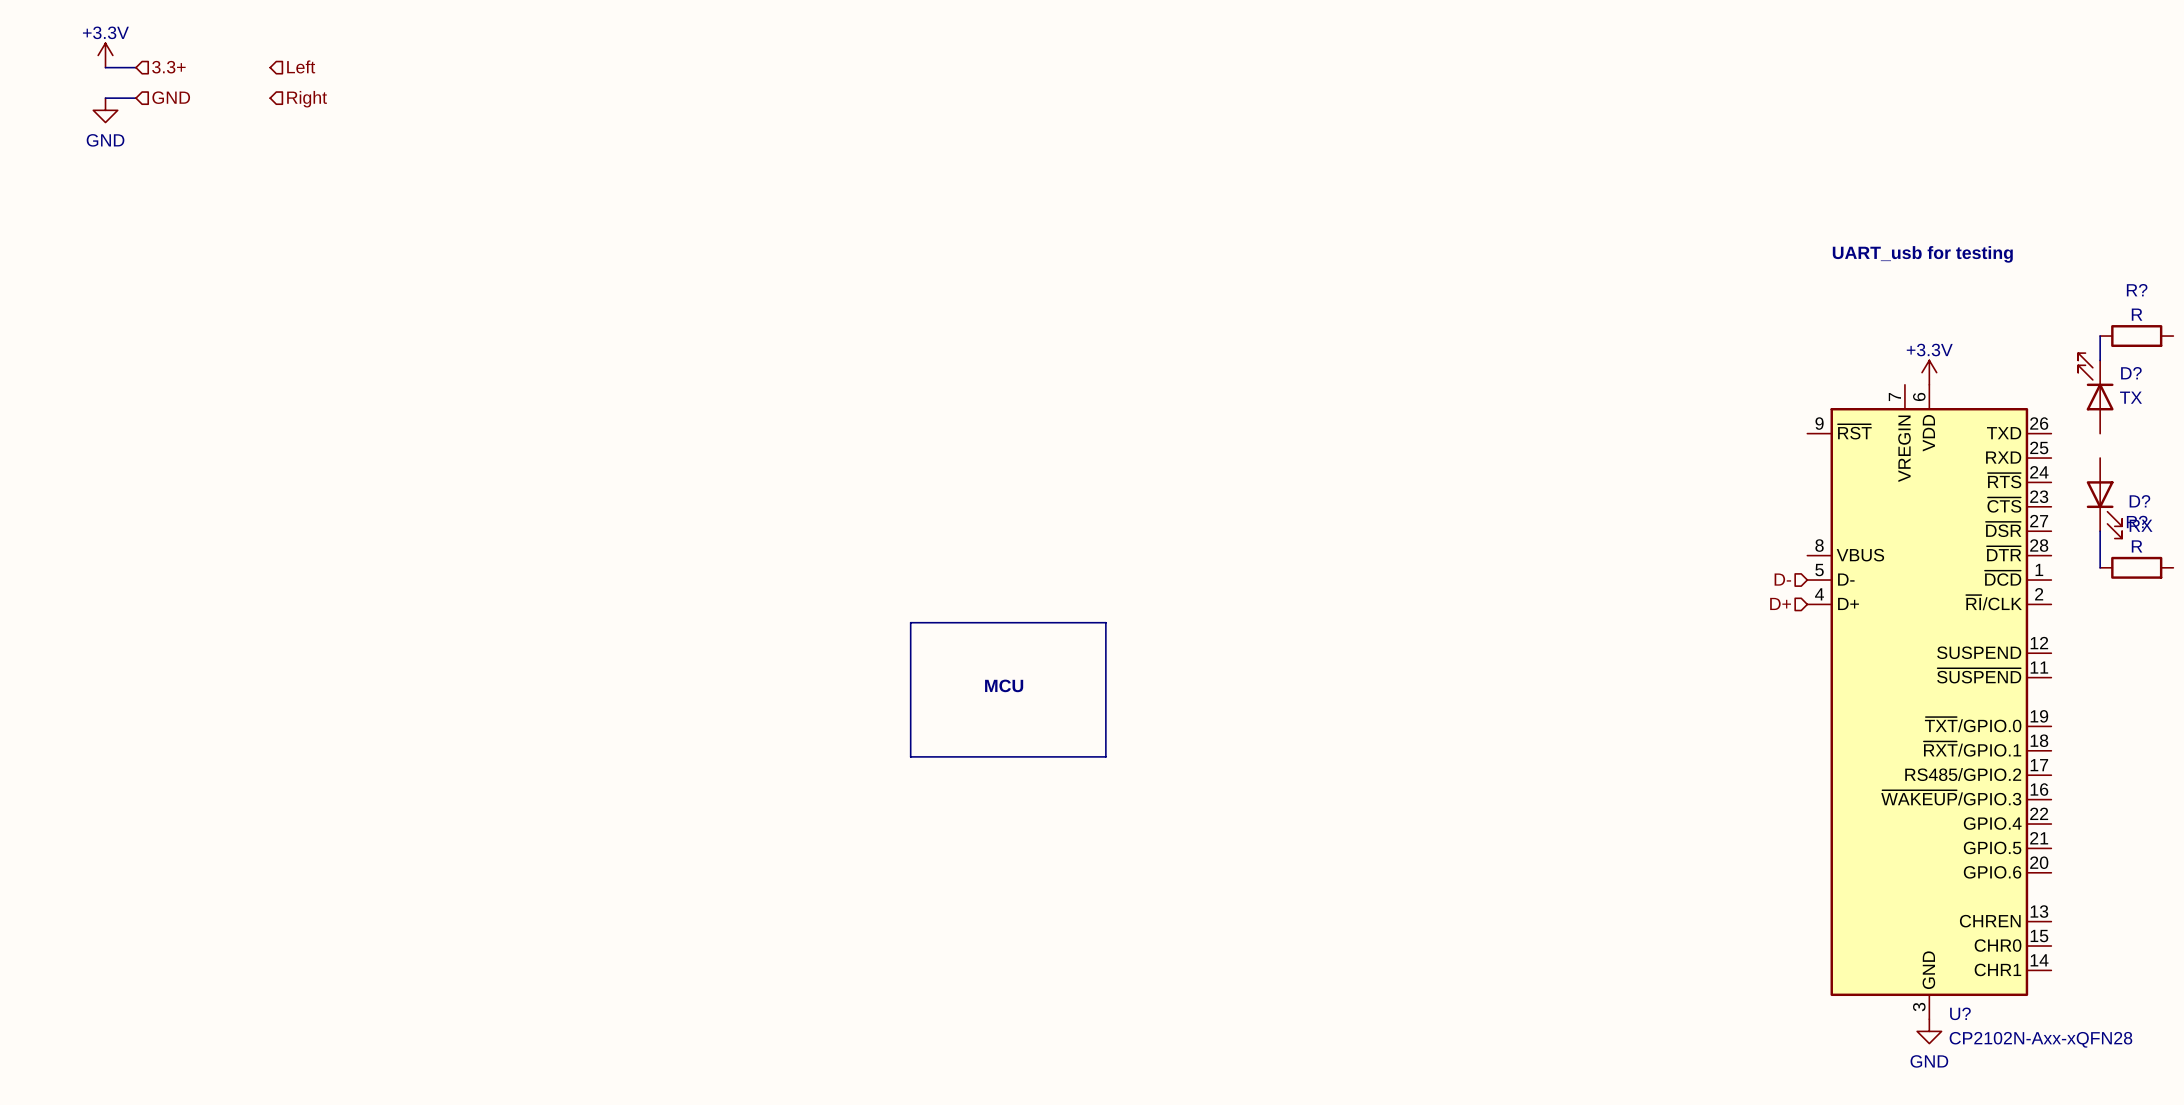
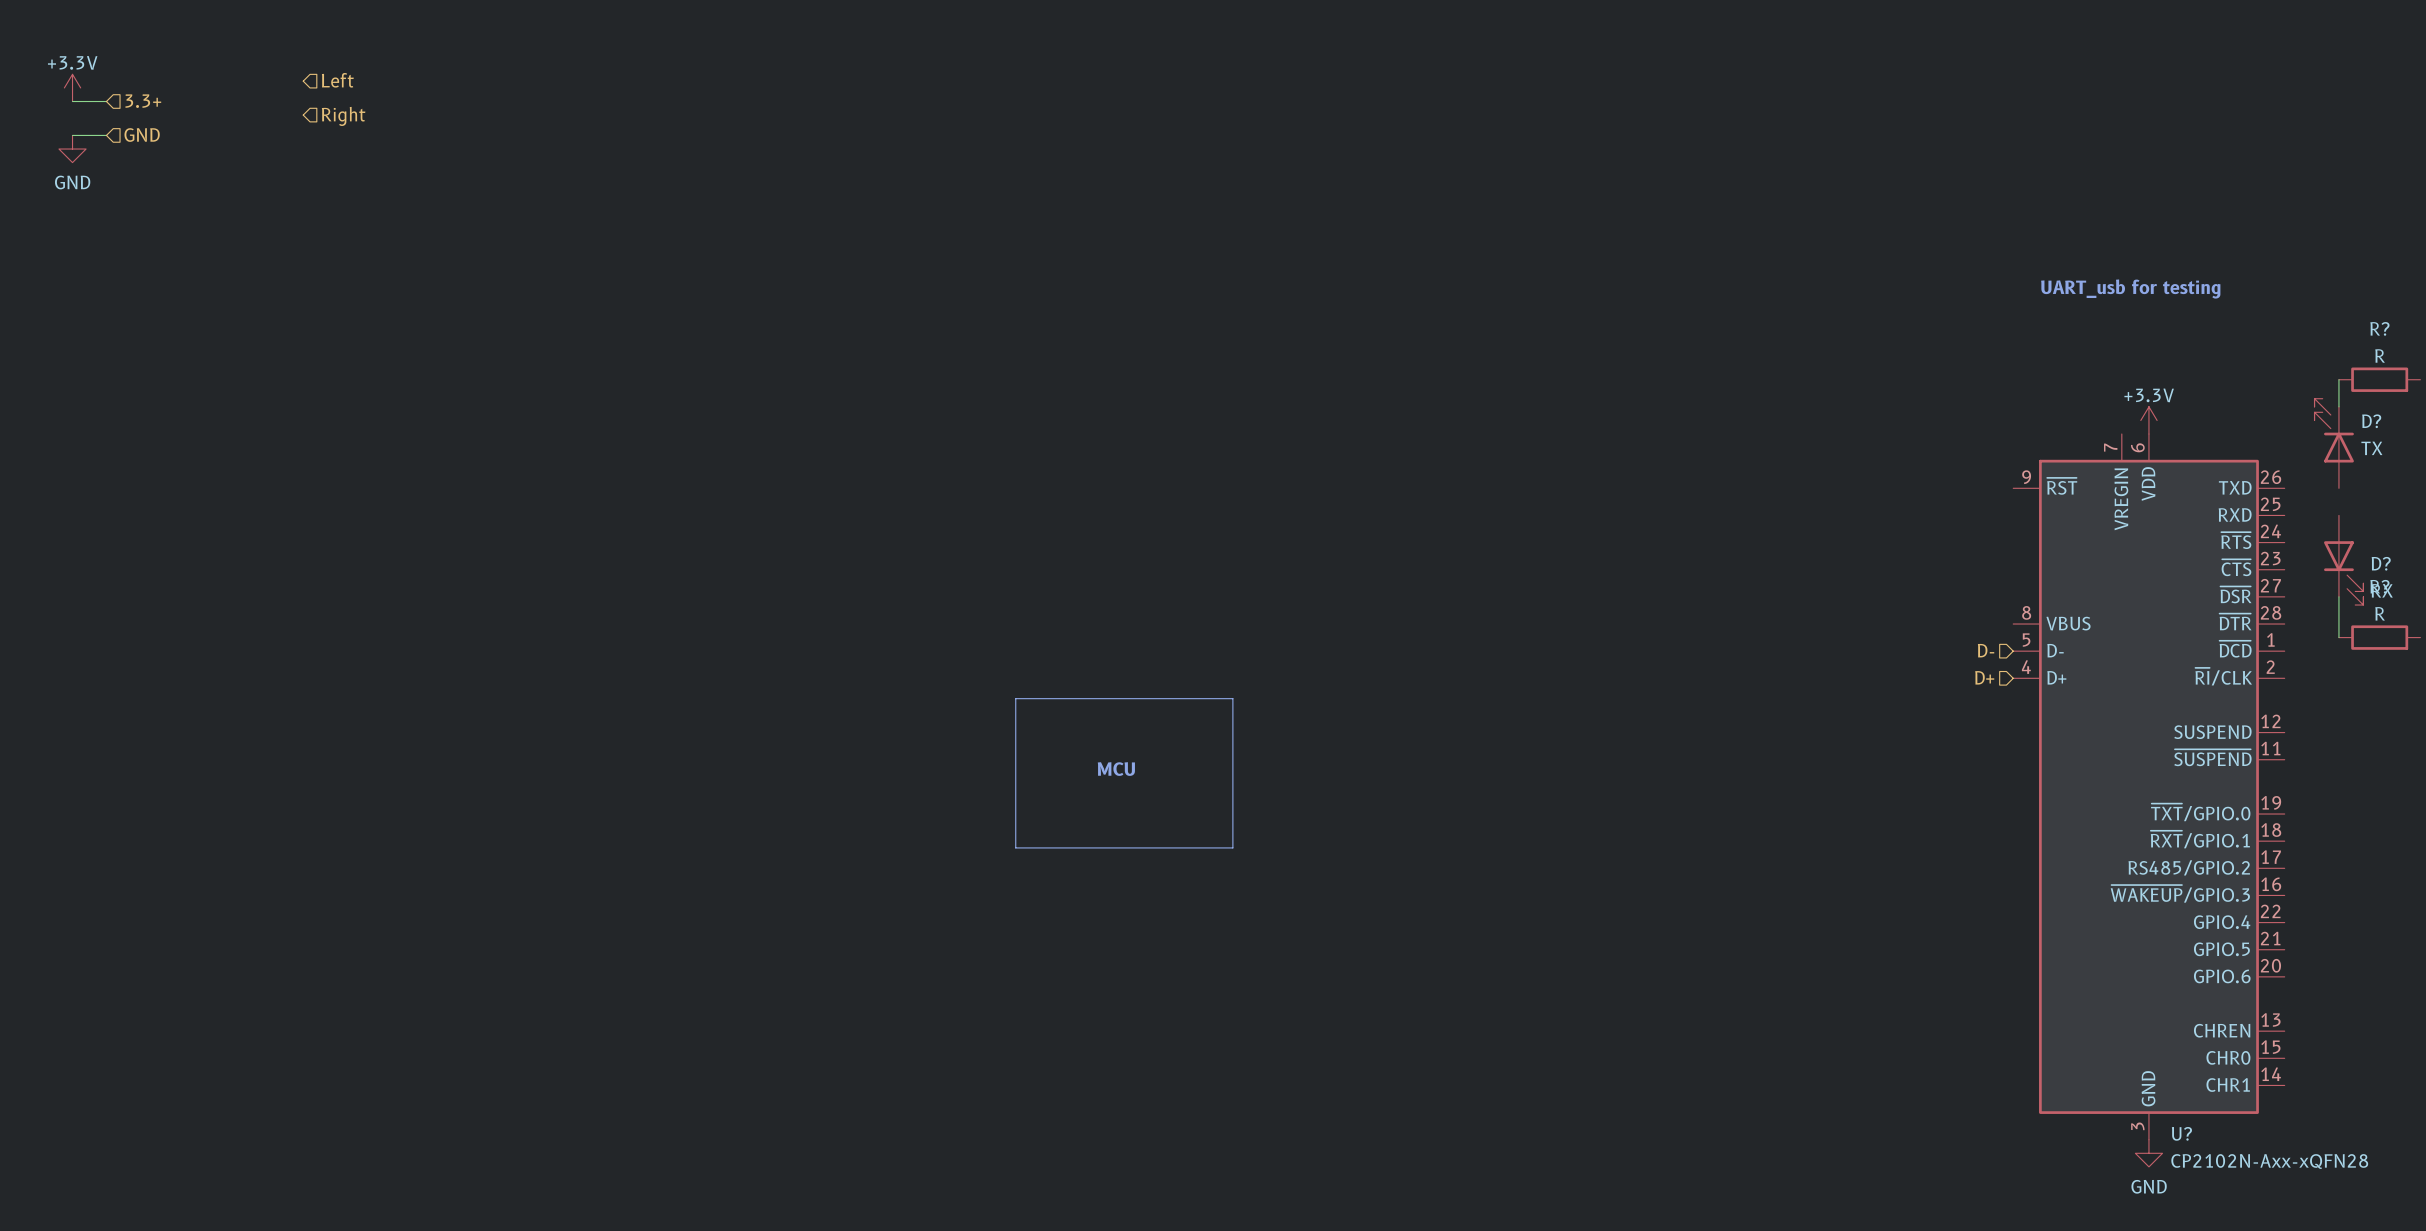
power symbol position: +3.3V (105, 55) -> +3.3V (72, 87)
wire: (105, 67) (136, 67) -> (72, 101) (106, 101)
hierarchical label position: 3.3+ (168, 67) -> 3.3+ (143, 101)
hierarchical label position: GND (171, 97) -> GND (142, 135)
wire: (105, 98) (136, 98) -> (72, 135) (106, 135)
power symbol position: GND (105, 110) -> GND (72, 149)

